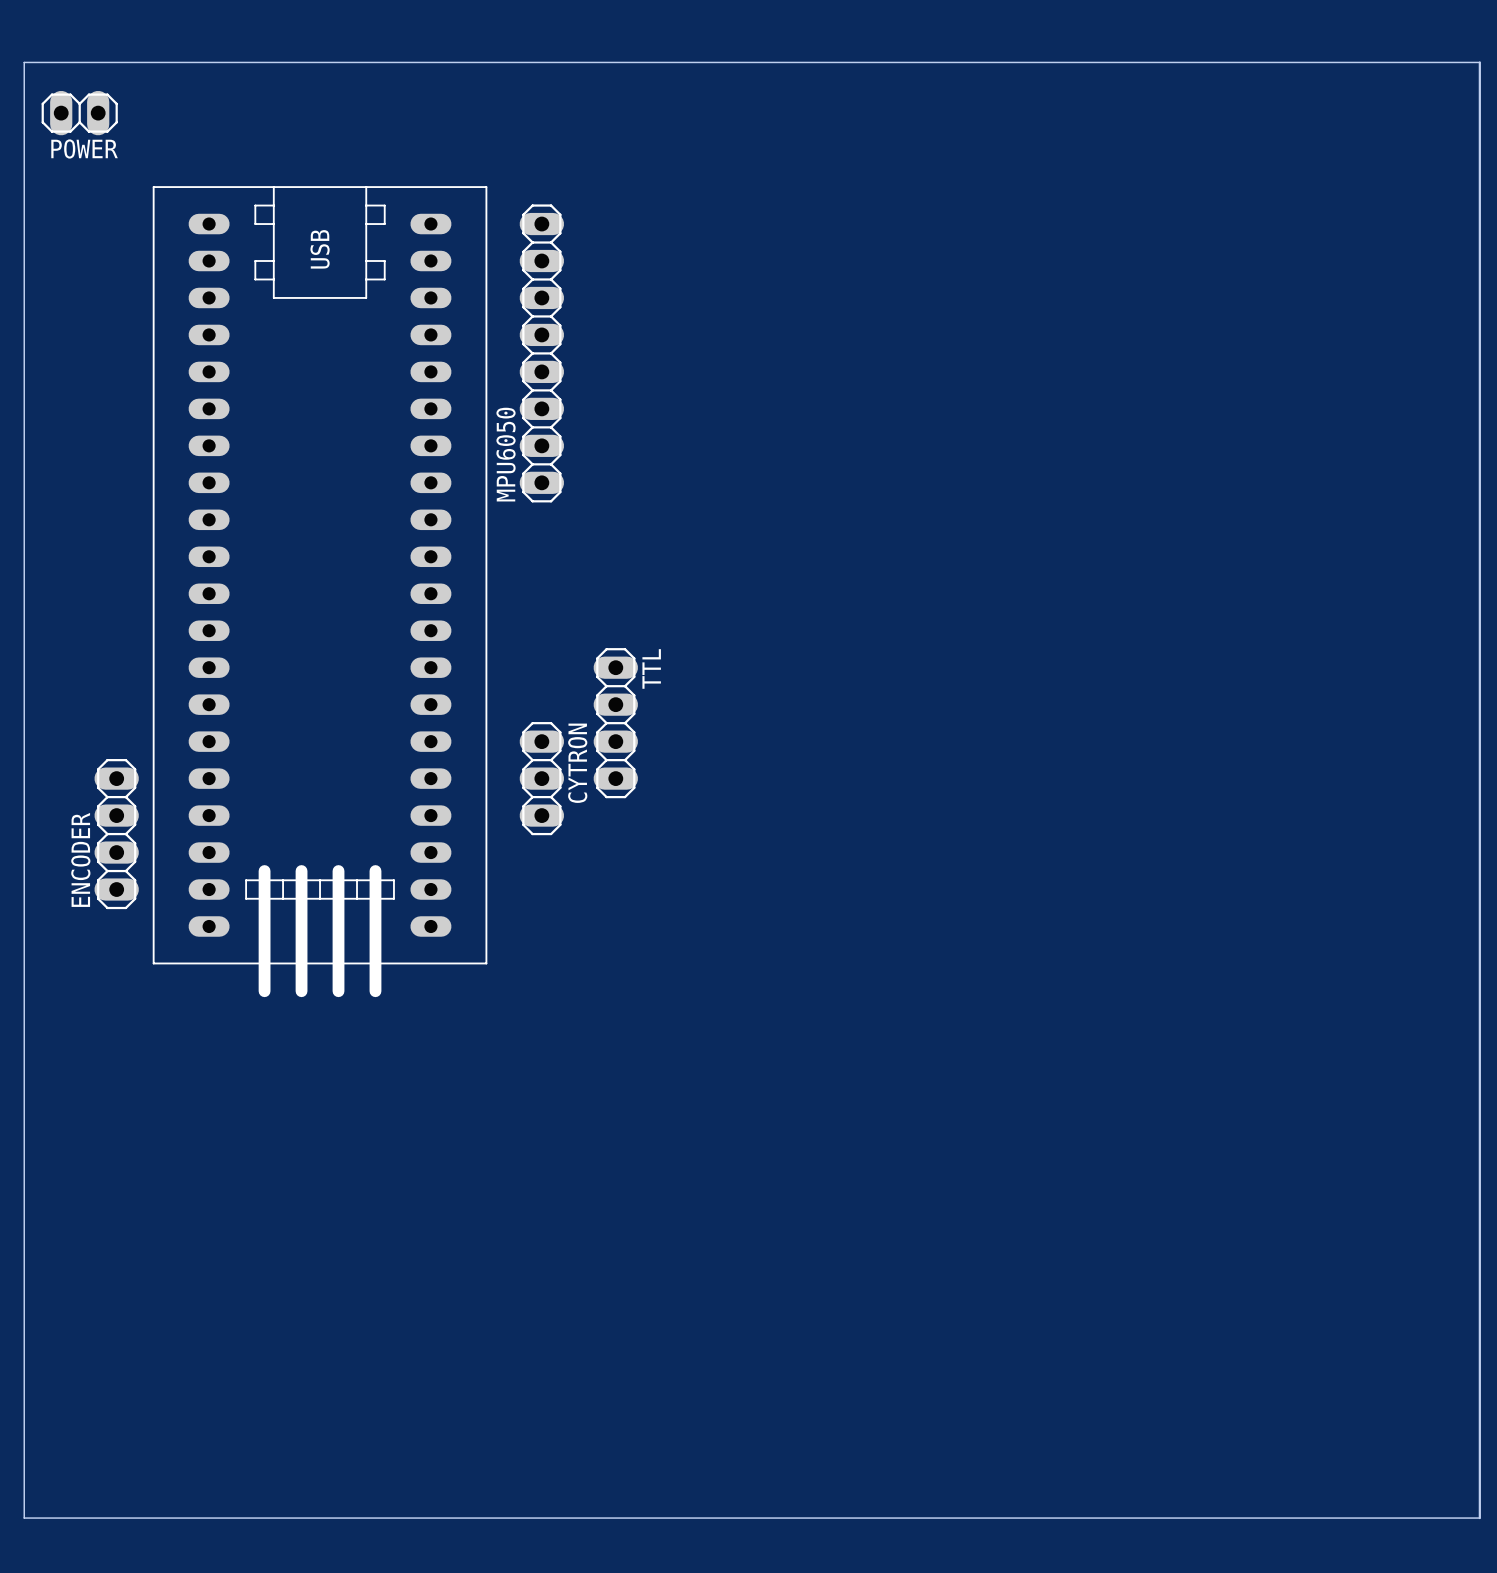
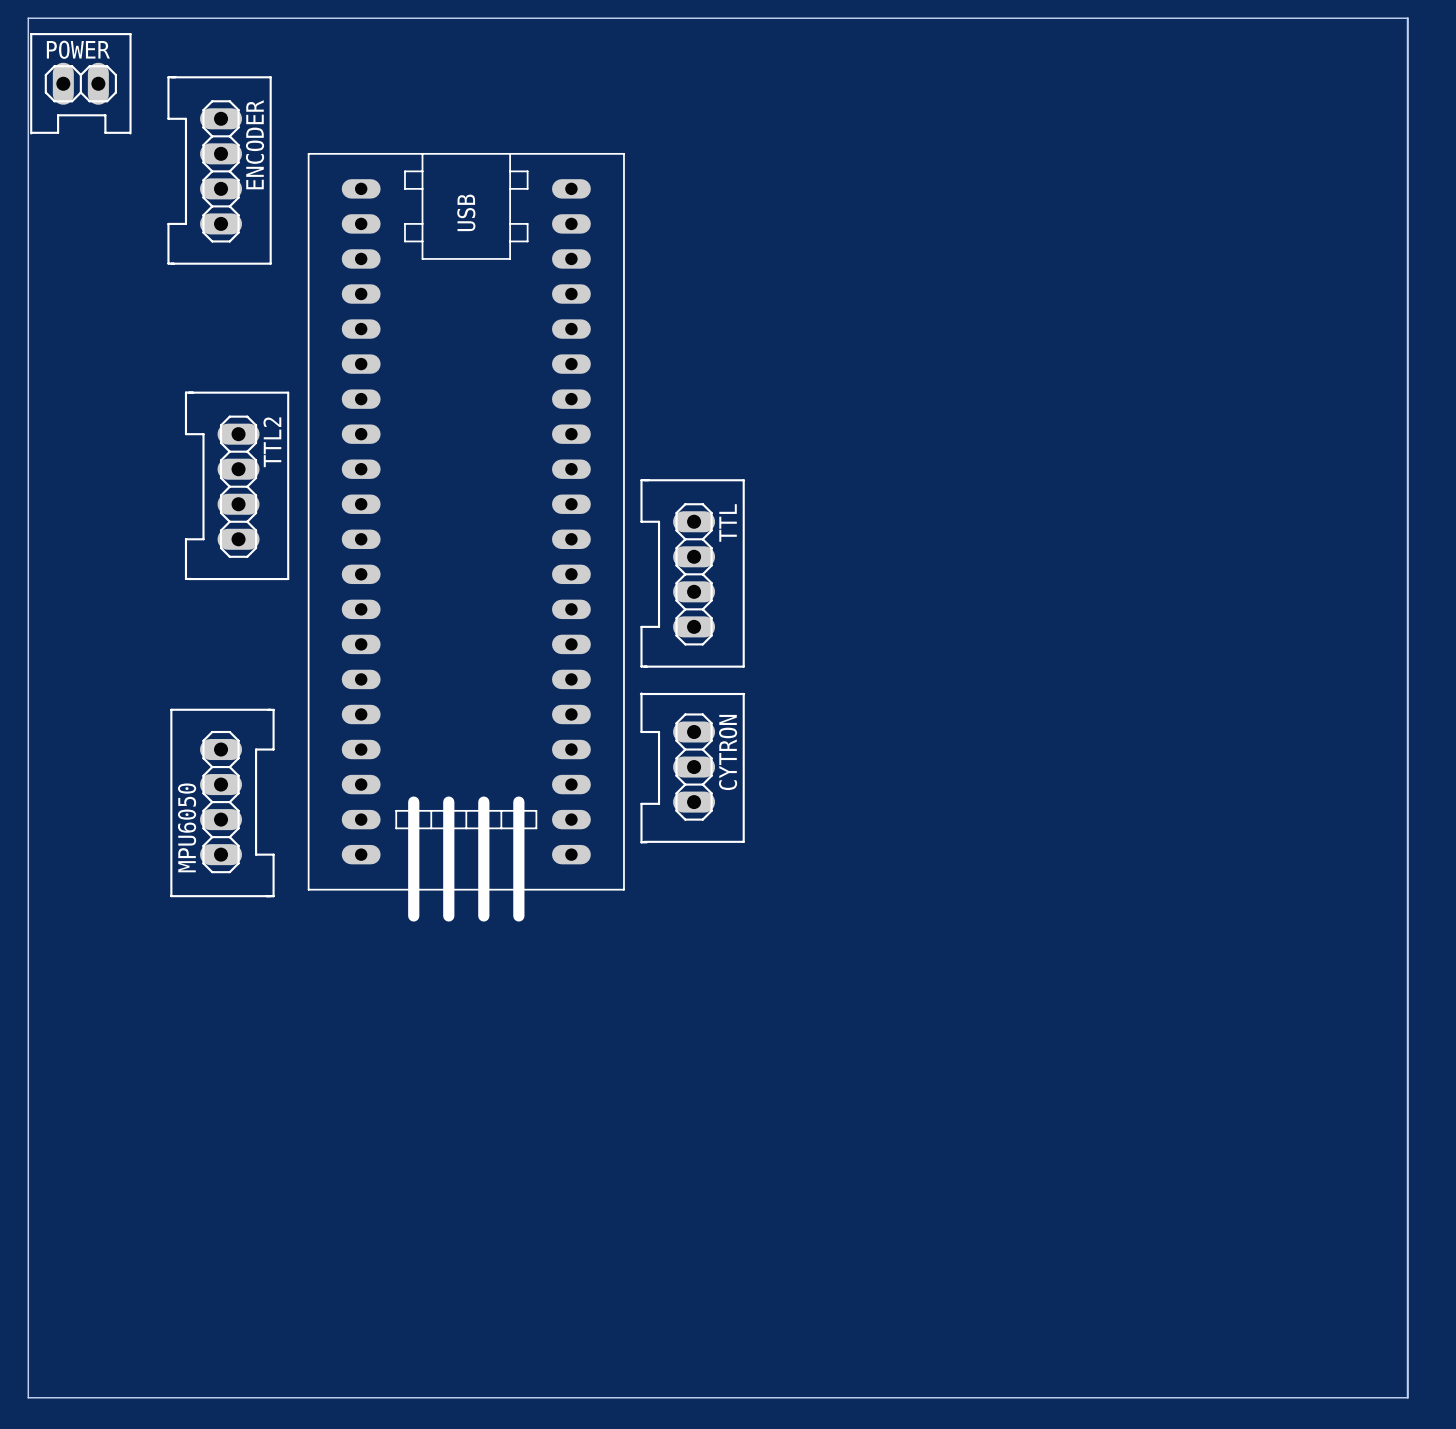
POWER: (79, 113) -> none
POWER: none -> (80, 83)
MPU6050 footprint: [519, 204, 565, 503] -> [170, 708, 275, 898]
ENCODER: none -> (219, 170)
MPU6050 name position: MPU6050 (506, 454) -> MPU6050 (187, 827)
TTL2: none -> (237, 485)
part position: (320, 591) -> (466, 537)
TTL: none -> (692, 573)
TTL: (615, 723) -> none
CYTRON: (541, 778) -> none
ENCODER: (116, 834) -> none
CYTRON: none -> (692, 767)

